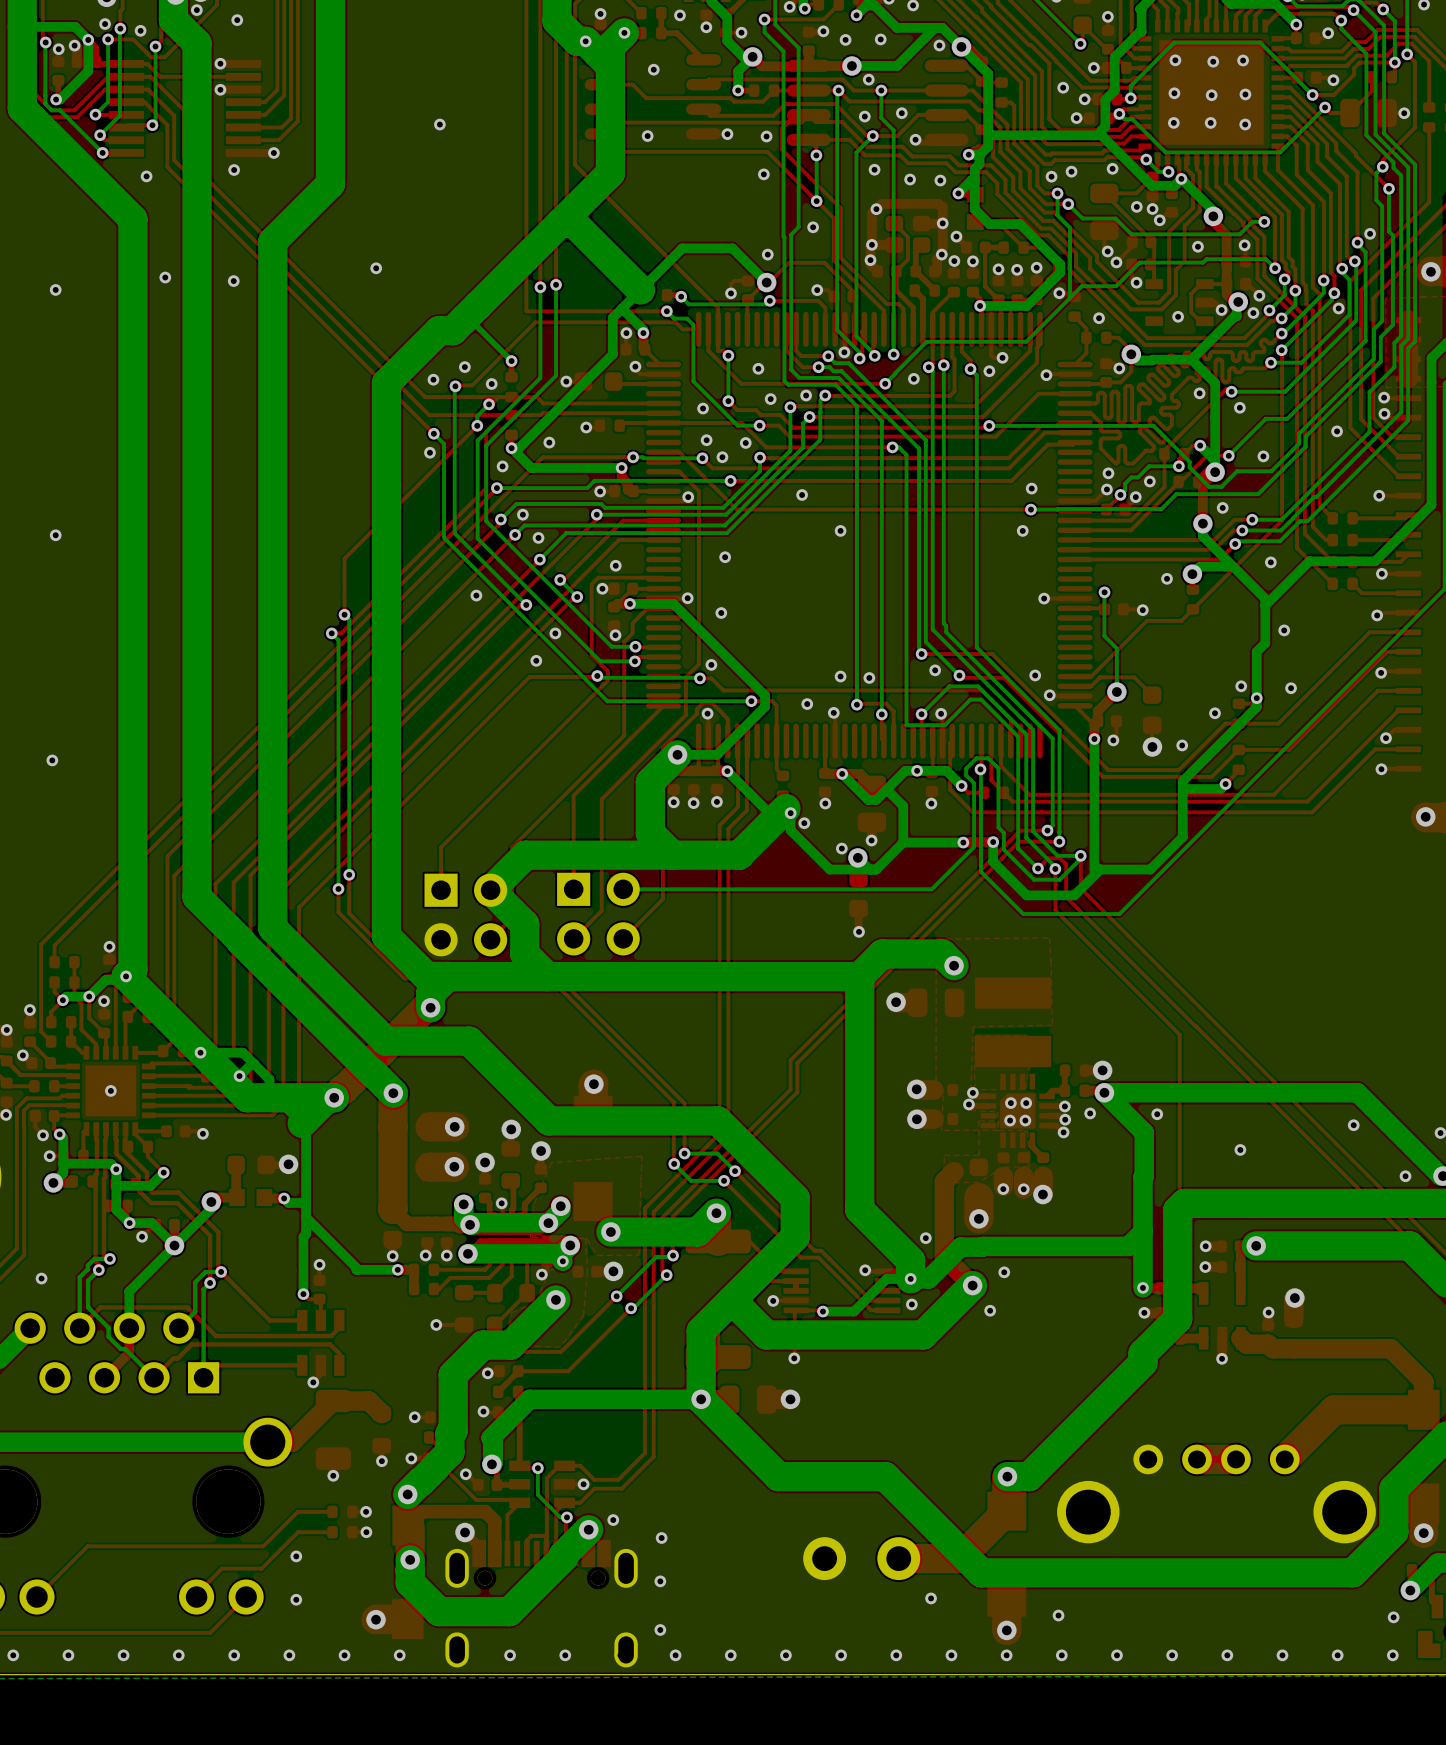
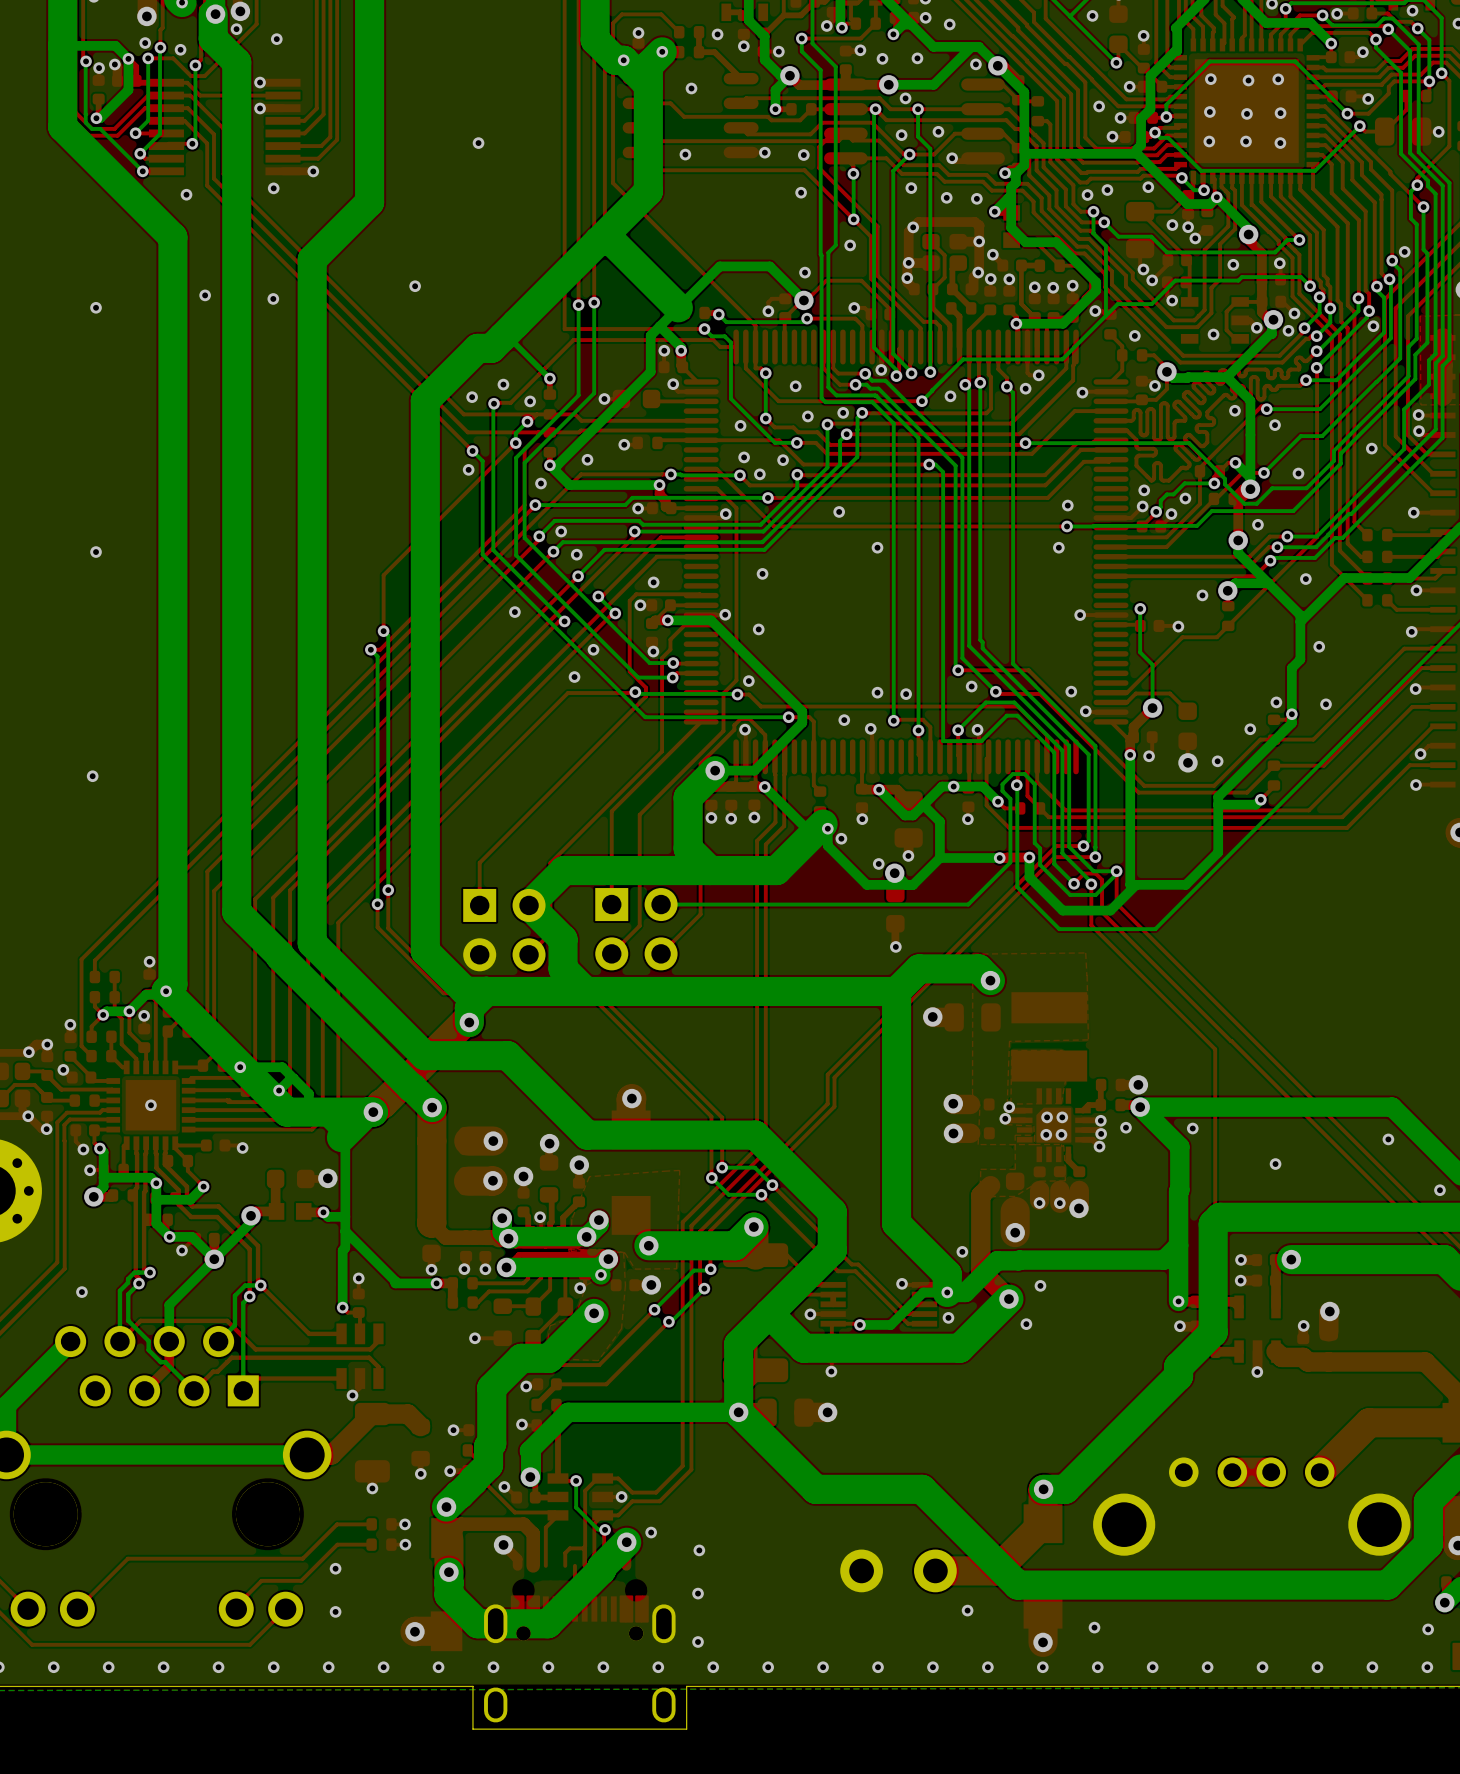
part position: (541, 1603) -> (579, 1658)
board edge: (648, 1674) (434, 1674) -> (686, 1686) (686, 1729) (472, 1729) (472, 1686)

